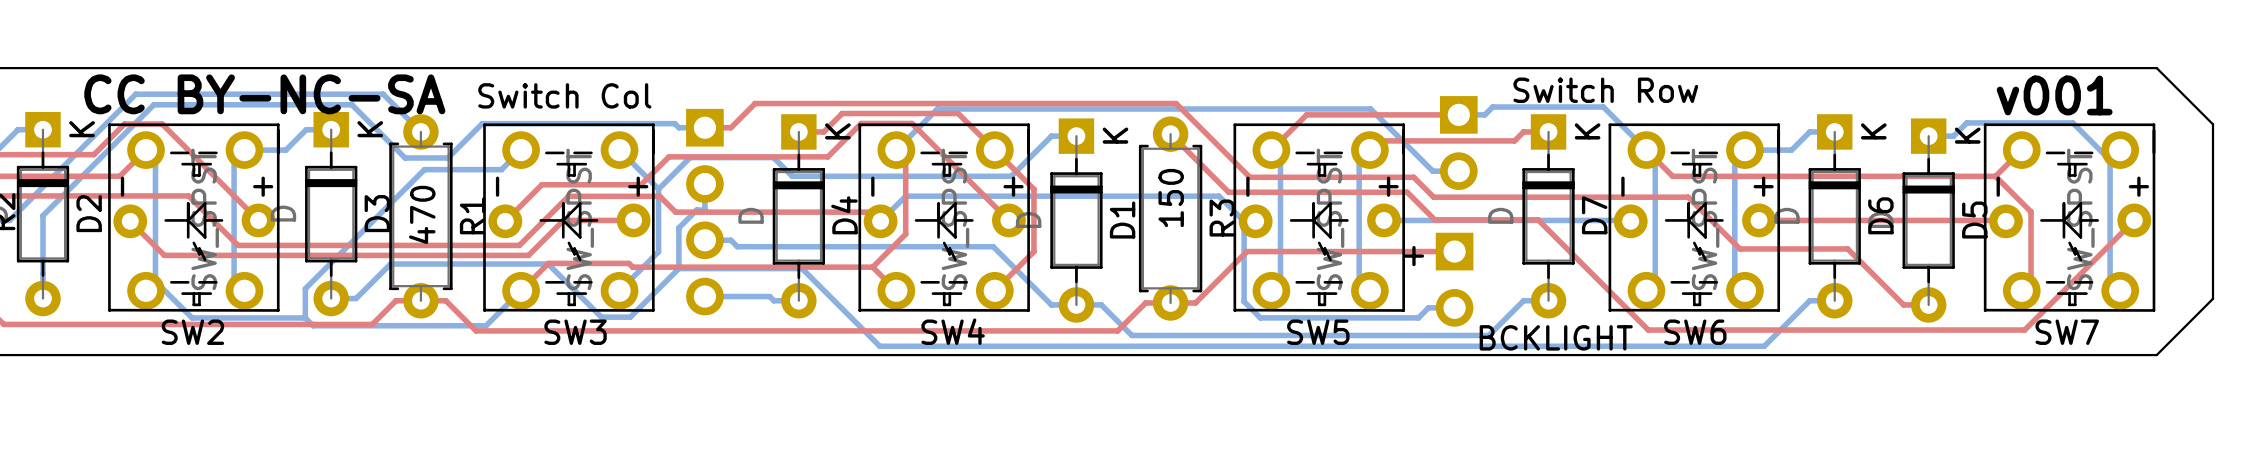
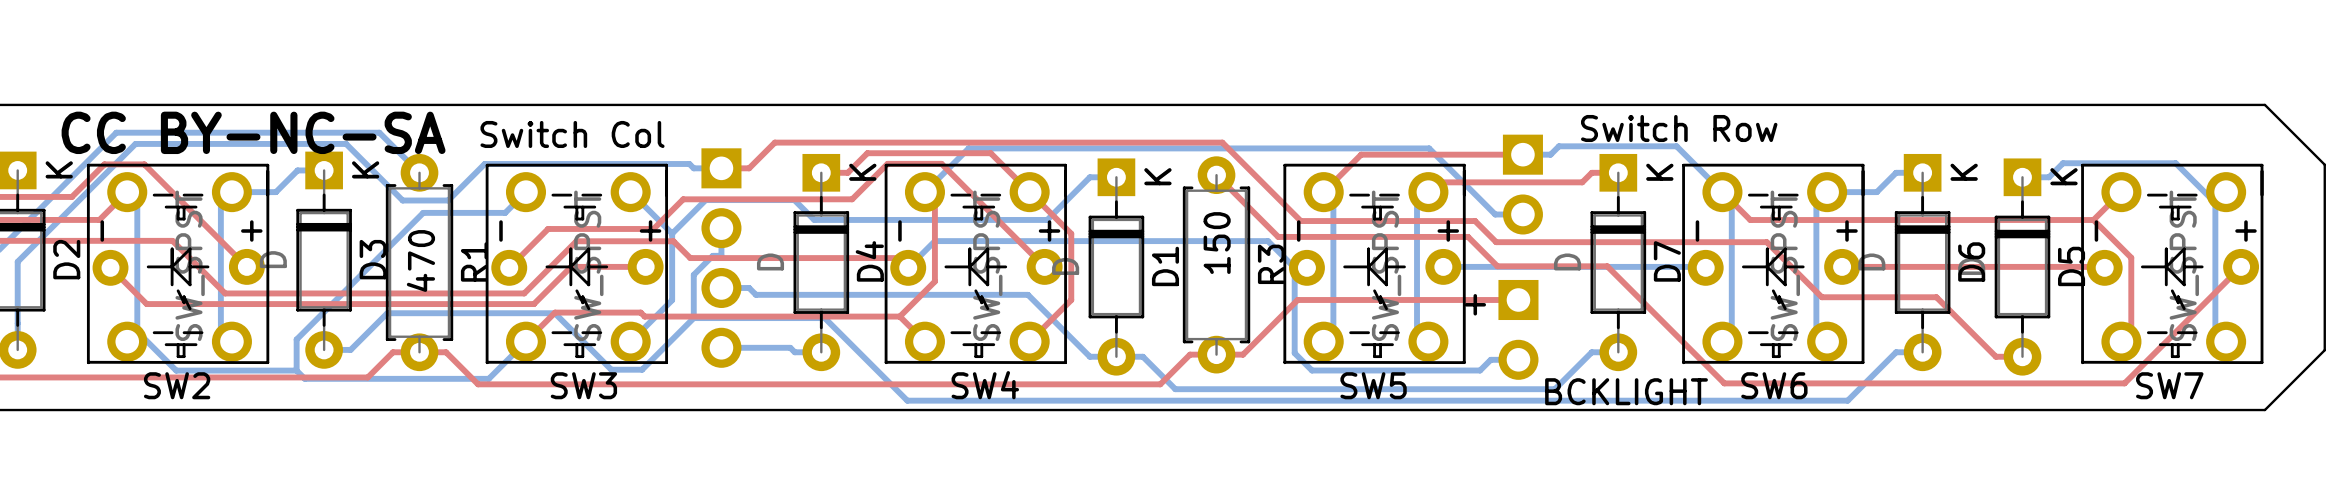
text: v001 (2054, 95) -> none

